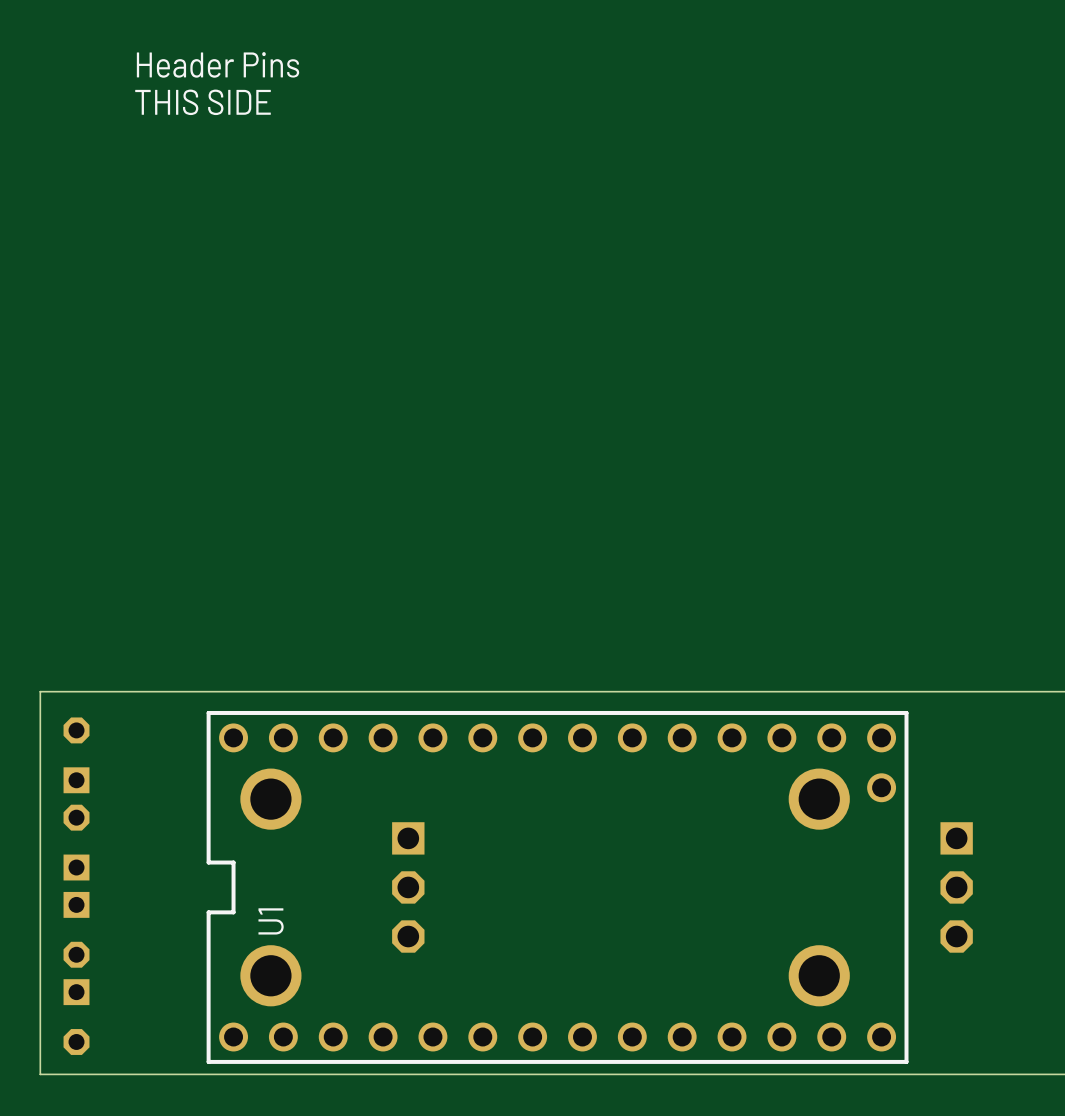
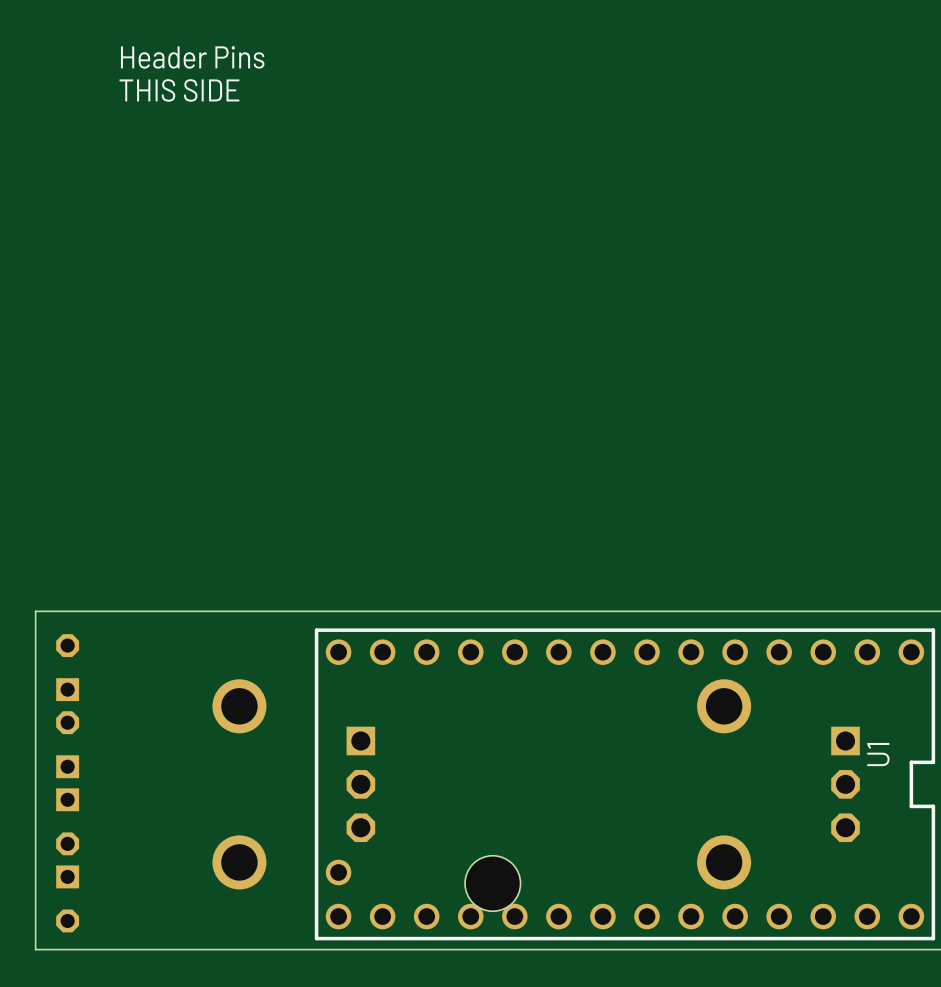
U1 rotation: 0° (557, 887) -> 180° (624, 784)
part: none -> (492, 883)

